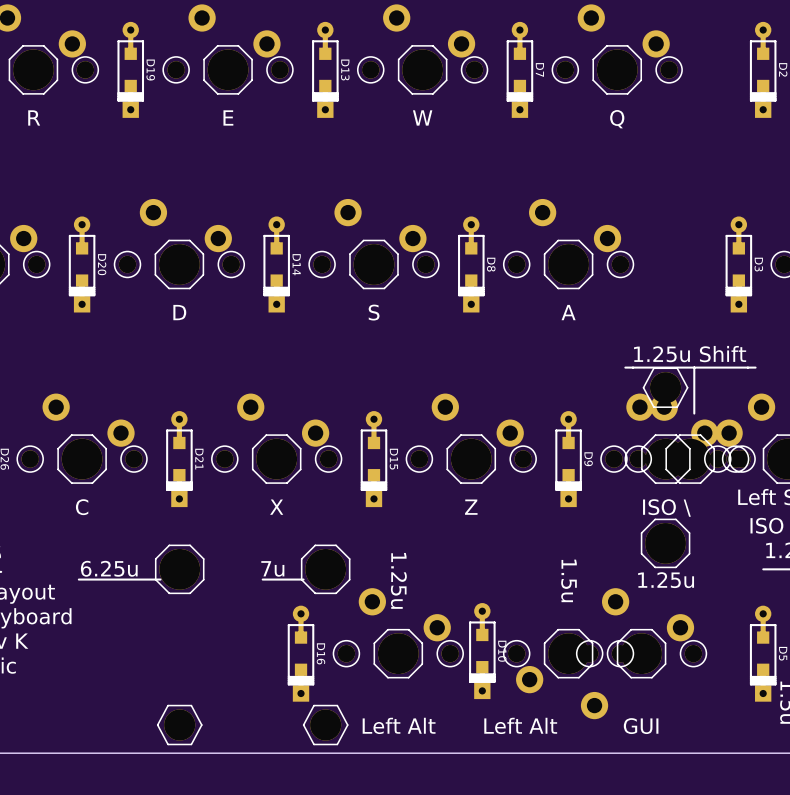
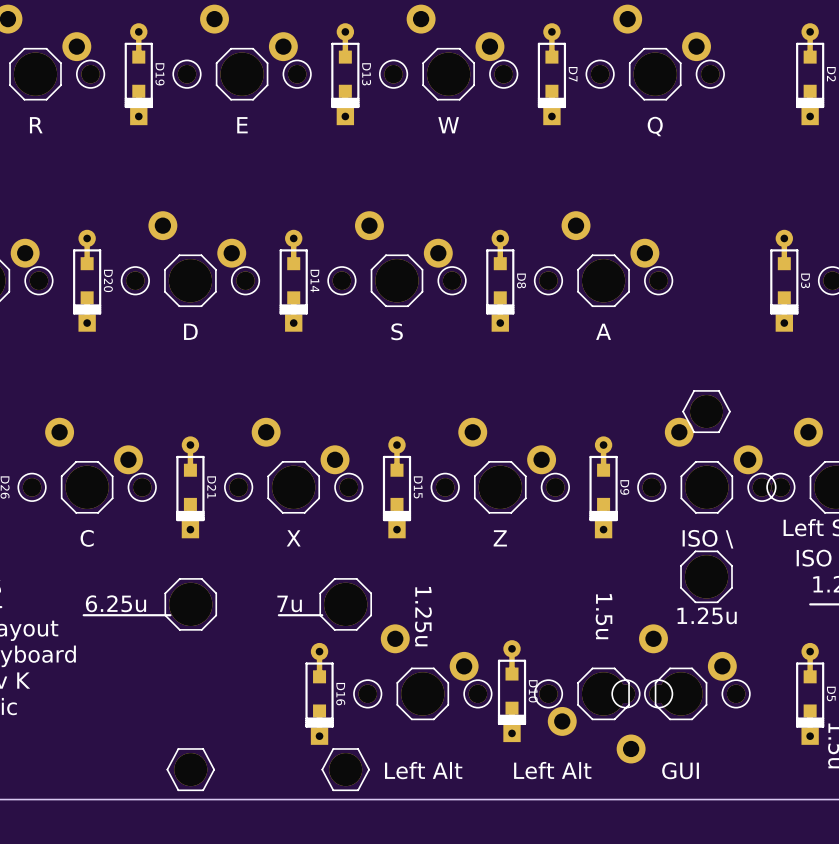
text: 1.25u Shift (690, 354) -> none
line: (694, 367) (694, 413) -> none
line: (755, 367) (625, 367) -> none
part: (690, 438) -> none

